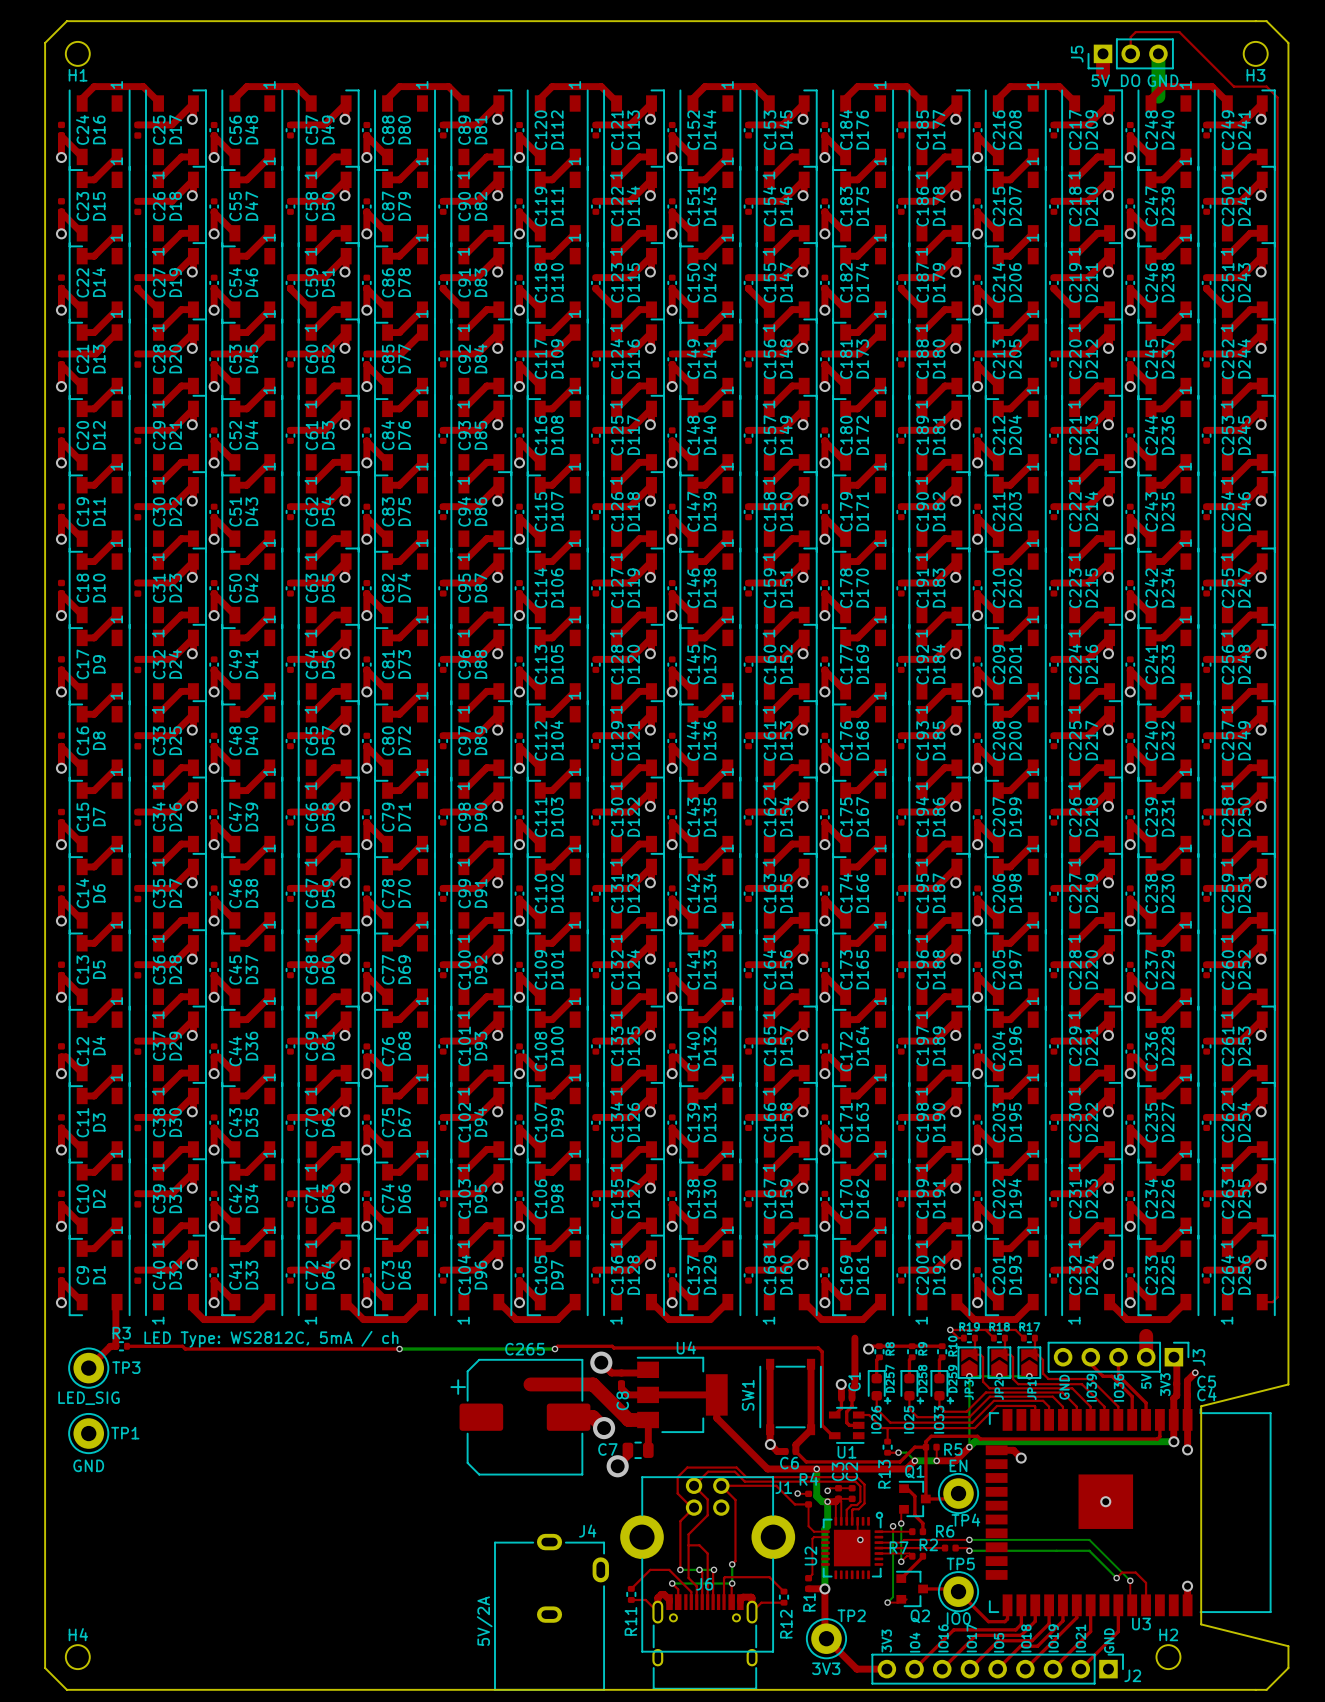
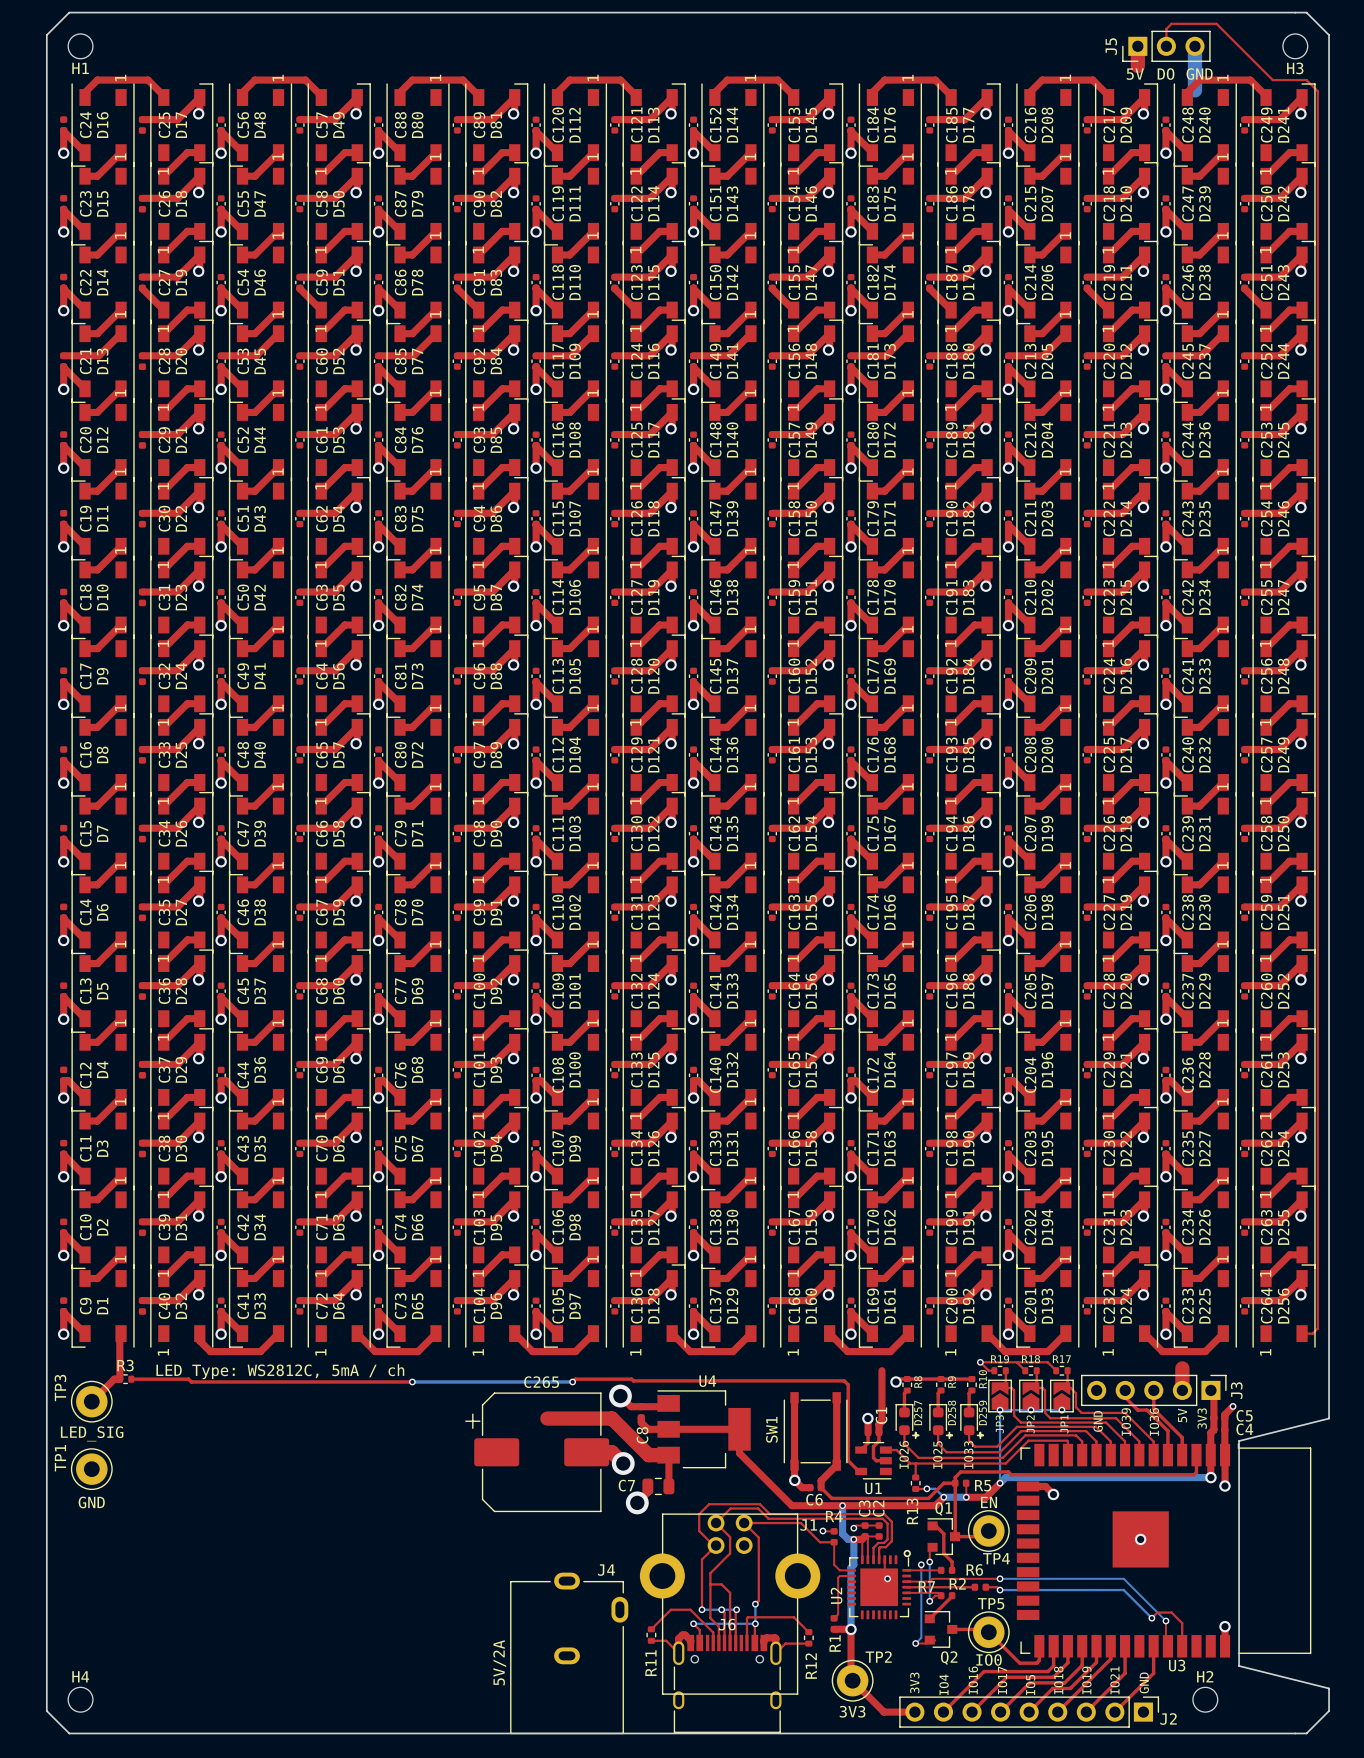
TP3 name rotation: 0° (126, 1367) -> 90° counterclockwise (60, 1388)
TP3 name position: TP3 (126, 1367) -> TP3 (60, 1388)
TP1 name rotation: 0° (125, 1433) -> 90° counterclockwise (60, 1458)
TP1 name position: TP1 (125, 1433) -> TP1 (60, 1458)

